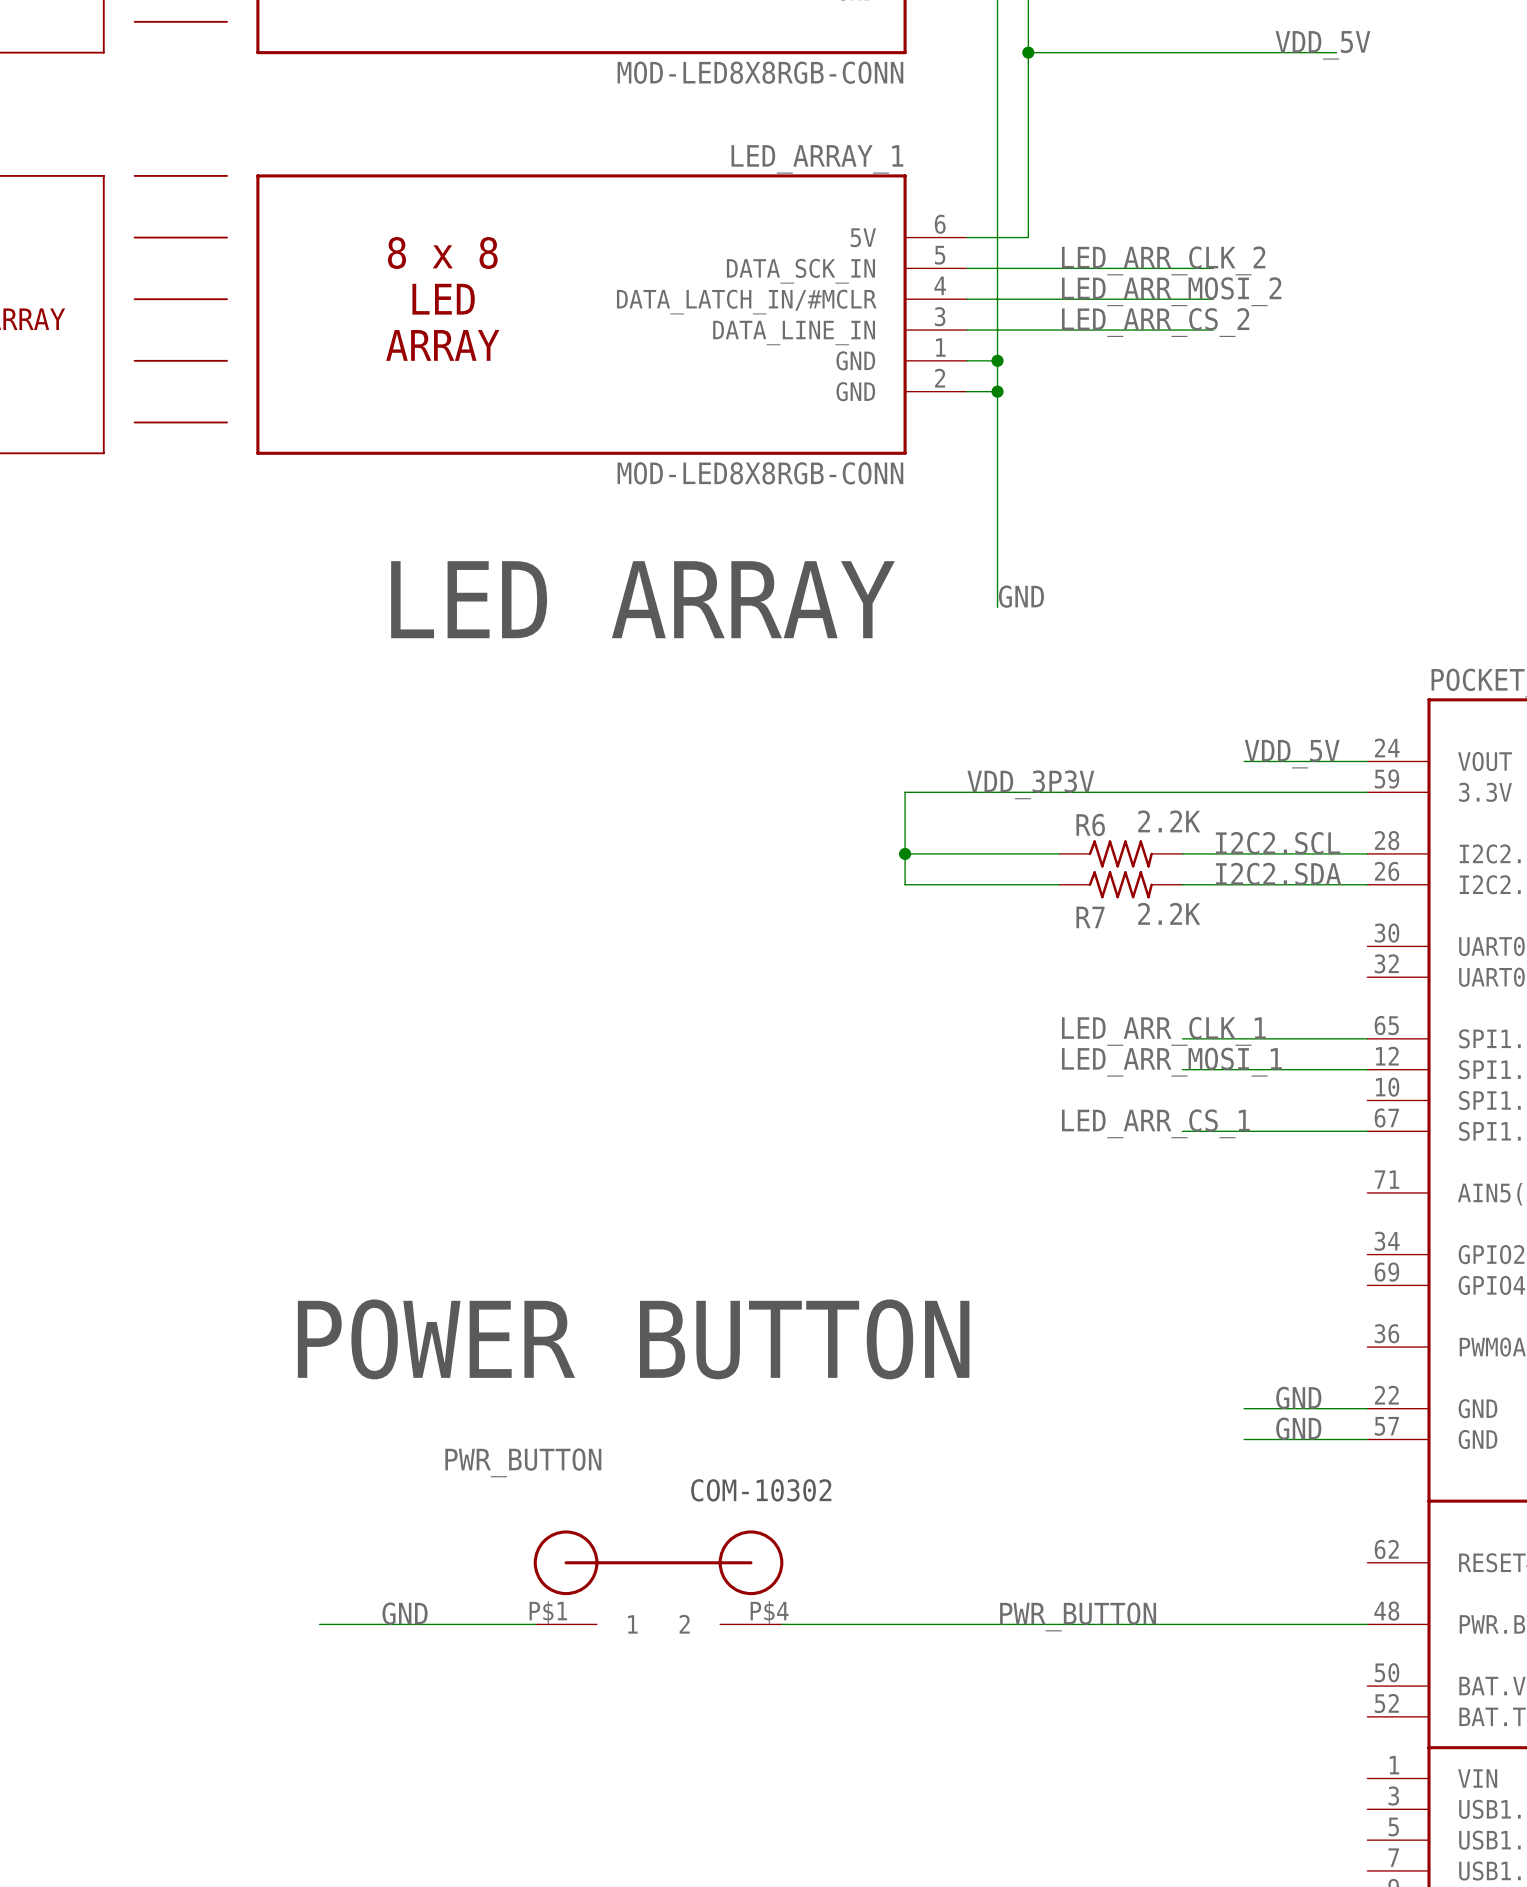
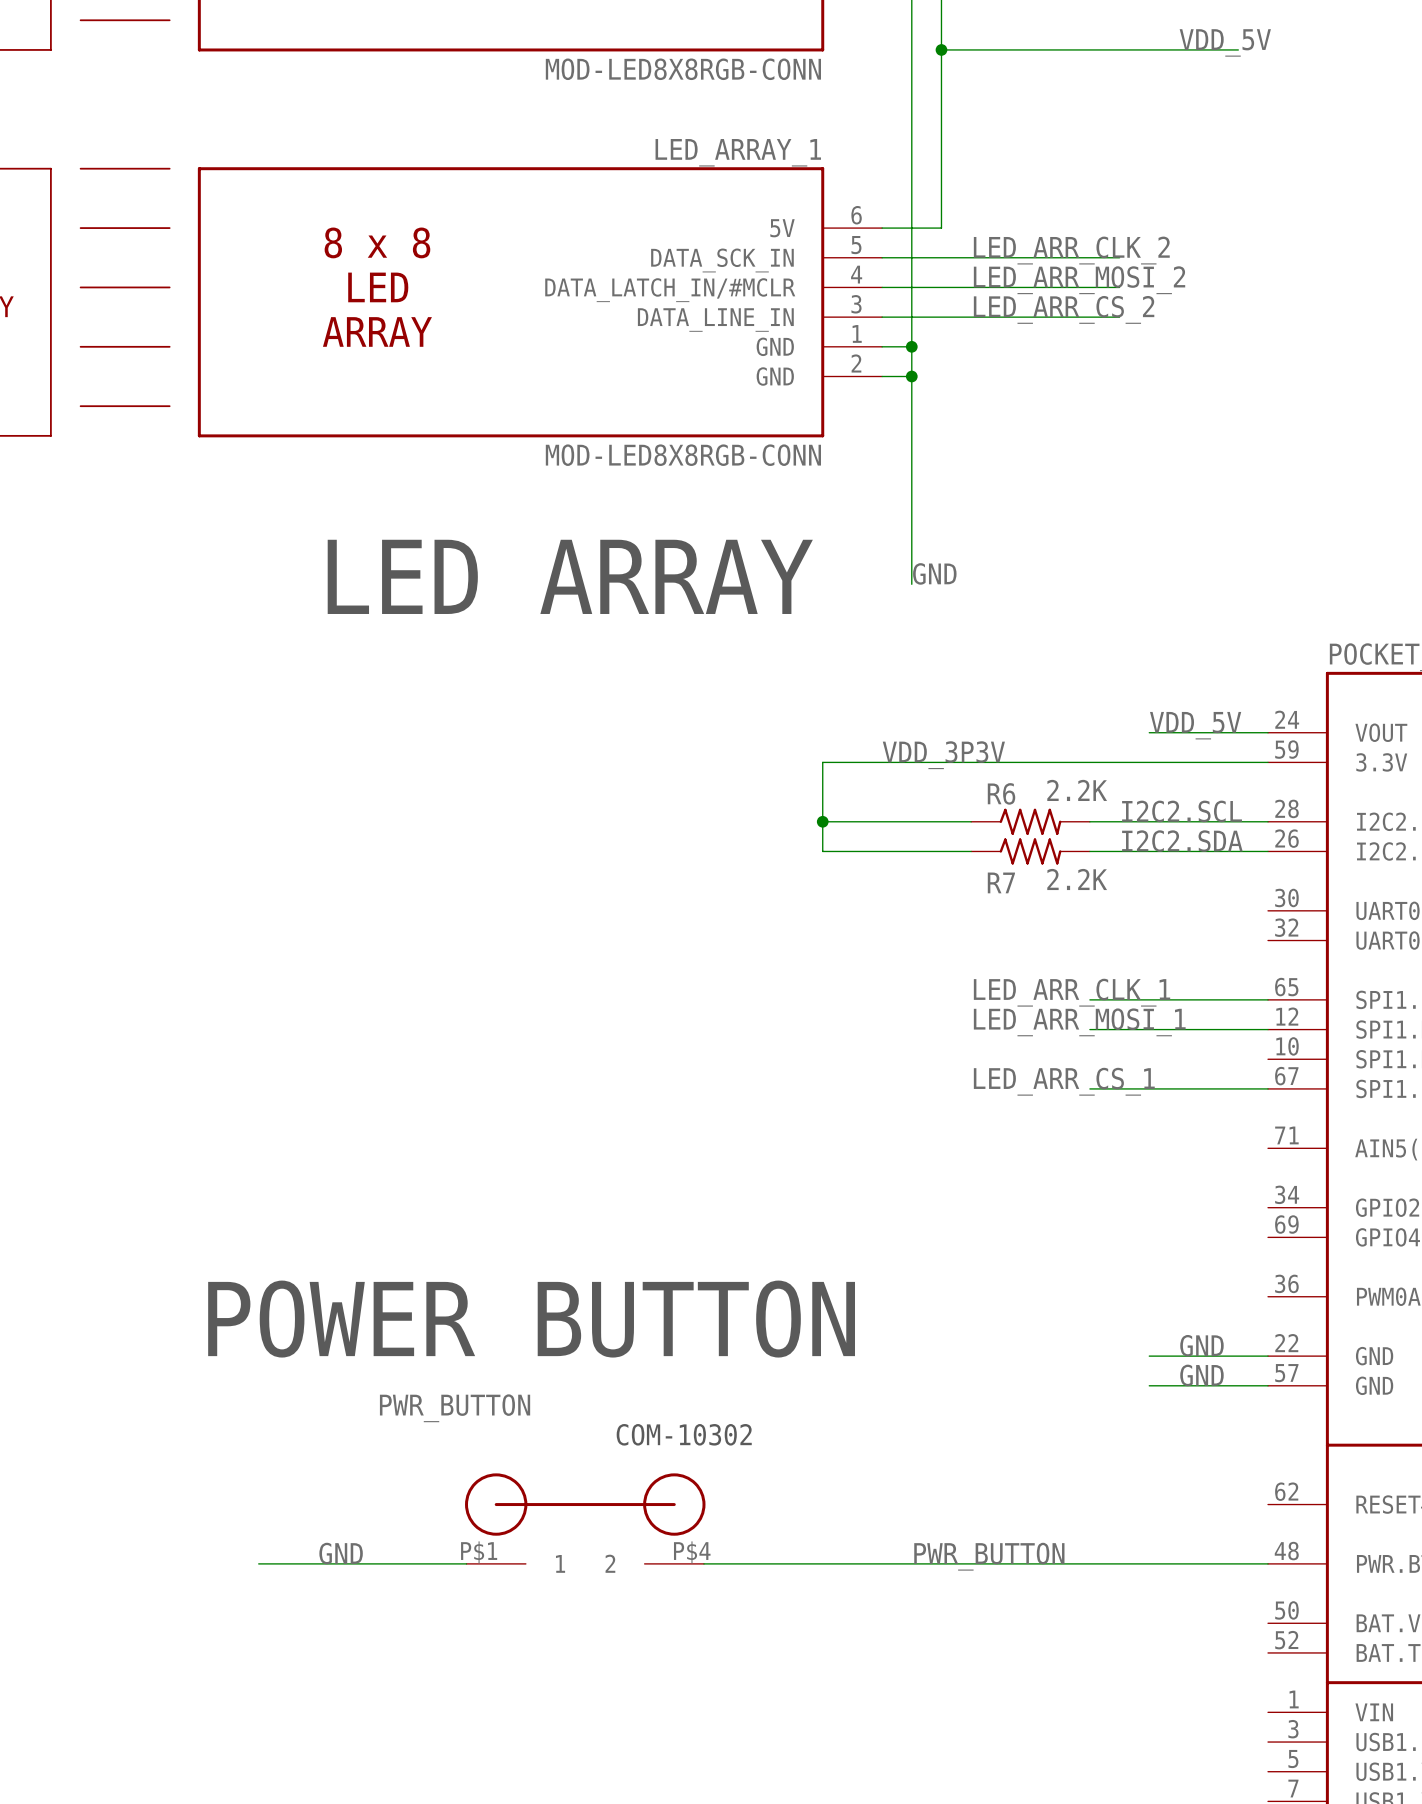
text position: POWER BUTTON (633, 1339) -> POWER BUTTON (531, 1319)

